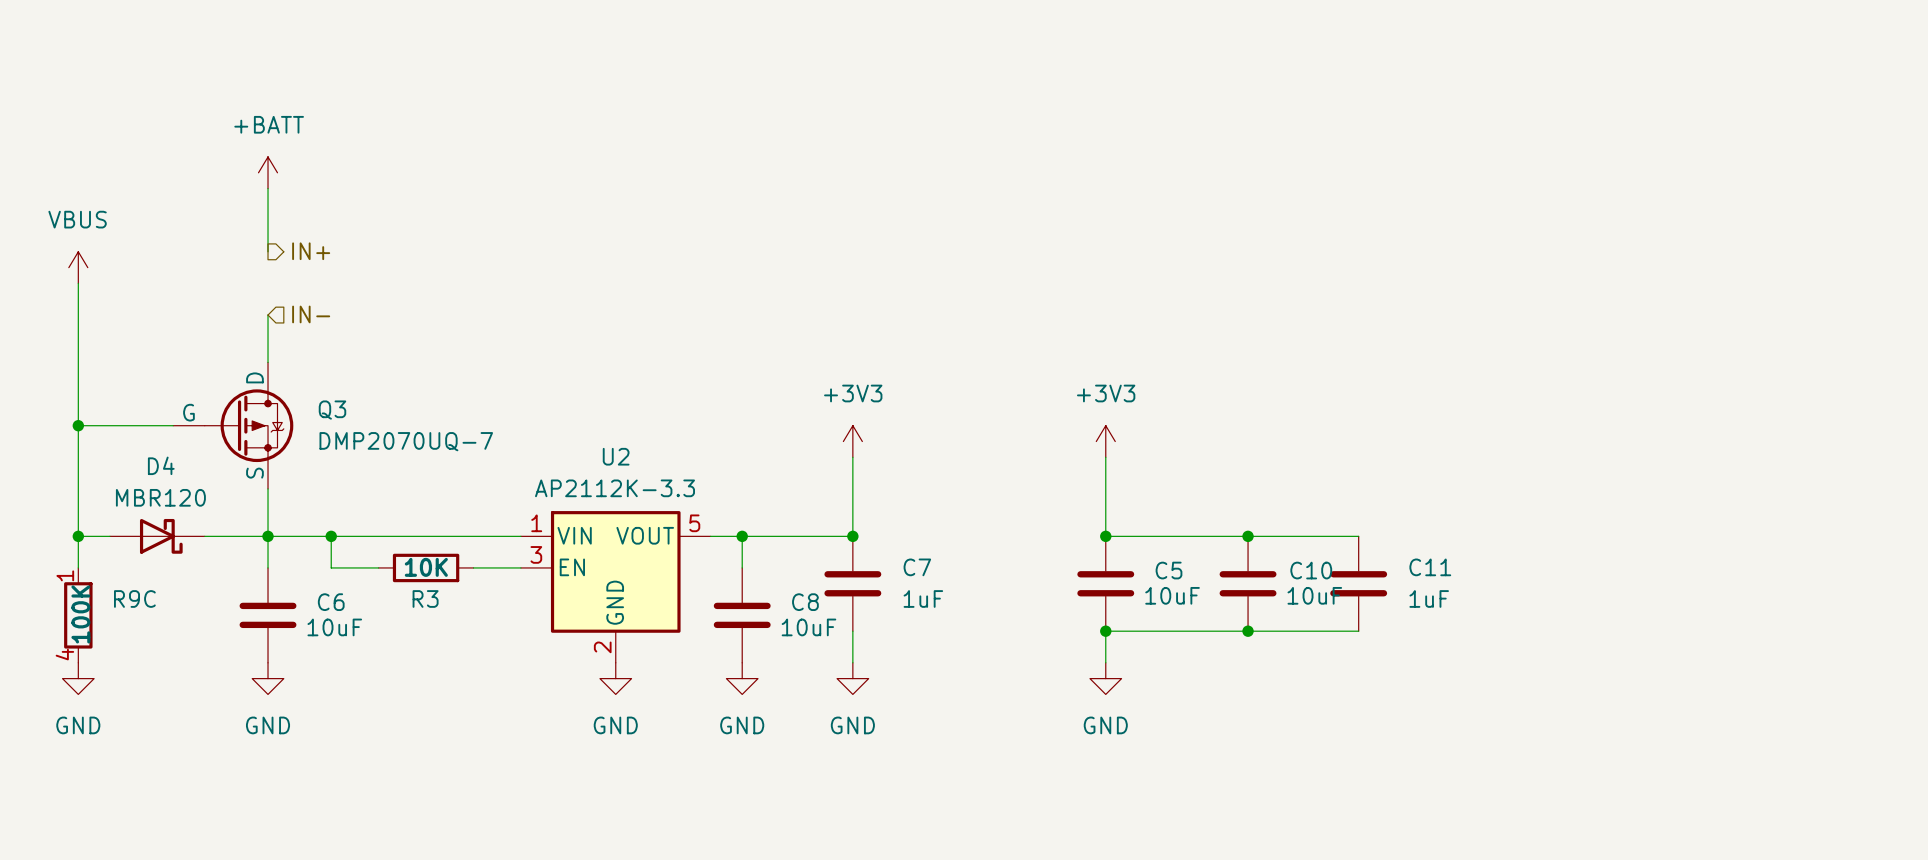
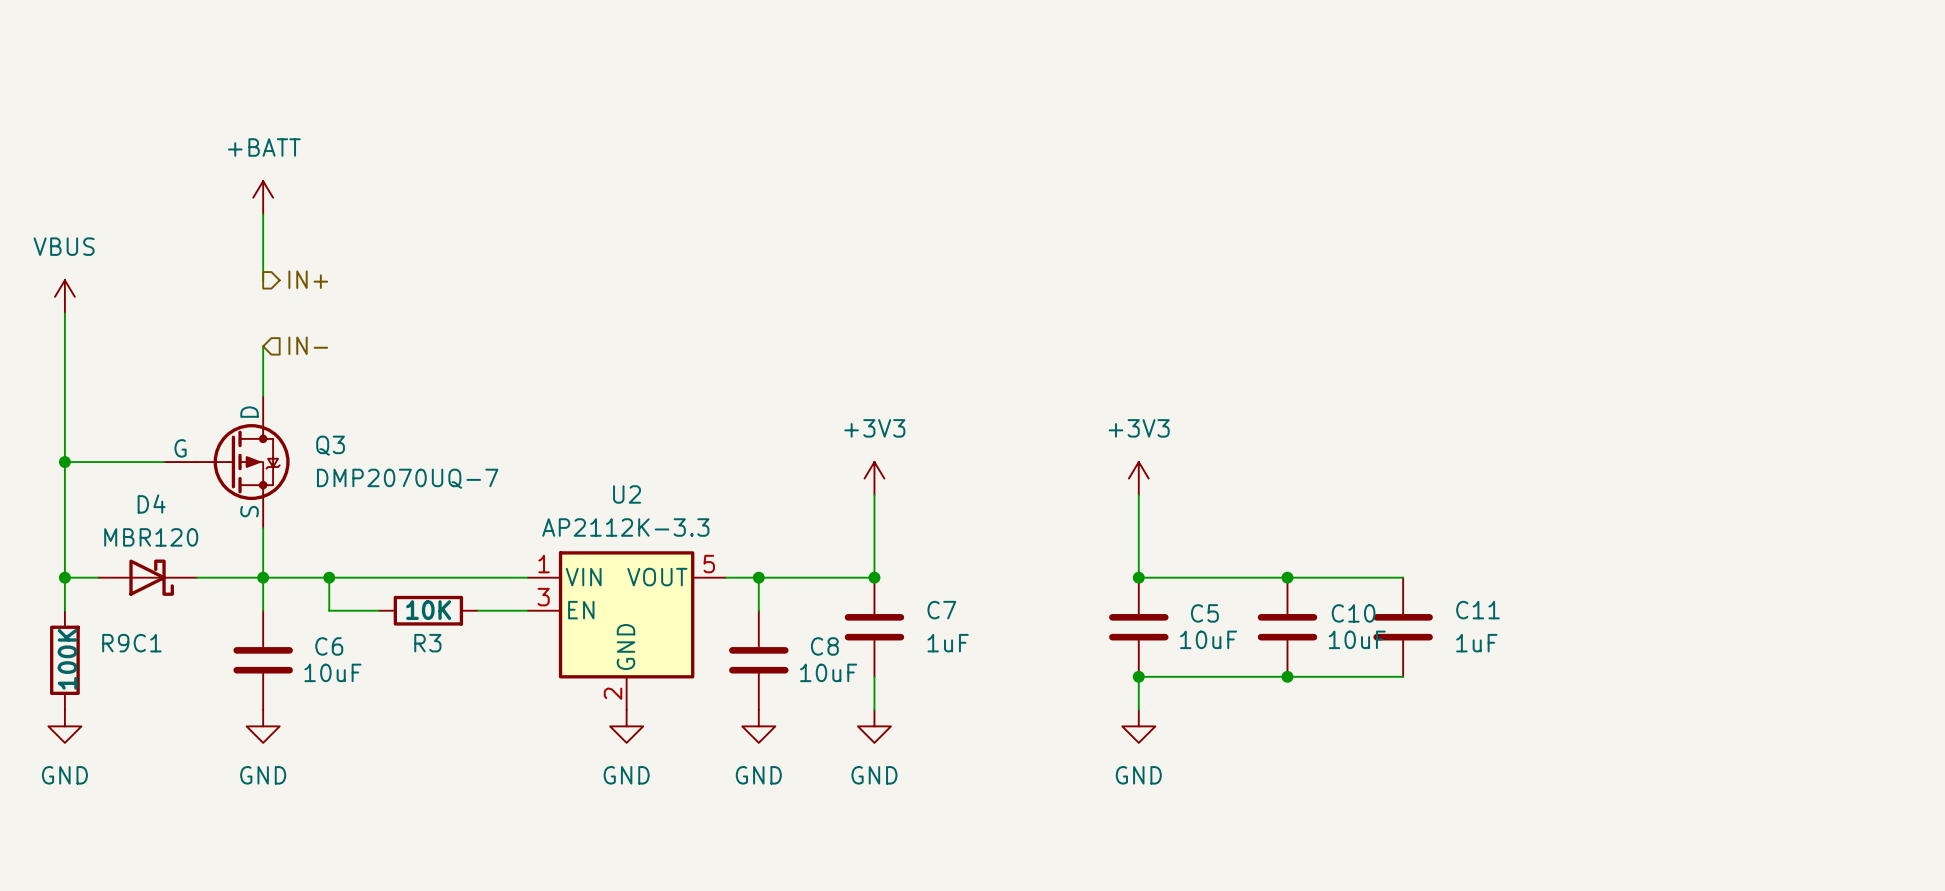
R9C pin number: 1 (65, 575) -> none
R9C name: R9C (134, 598) -> R9C1 (131, 643)
R9C pin number: 4 (64, 654) -> none

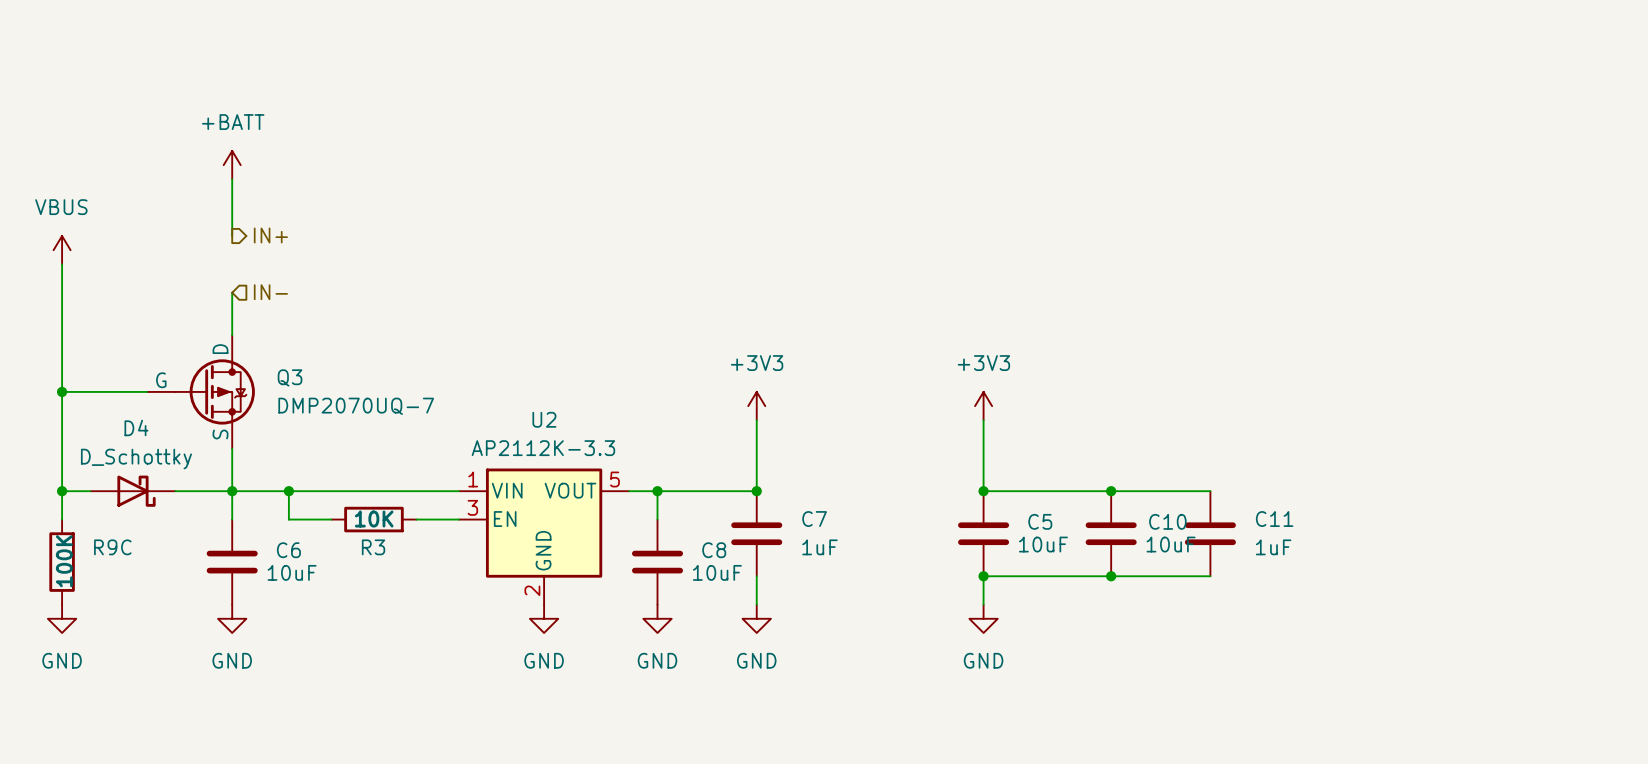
D4 value: MBR120 (151, 537) -> D_Schottky (136, 459)
R9C1 name: R9C1 (131, 643) -> R9C (112, 547)

